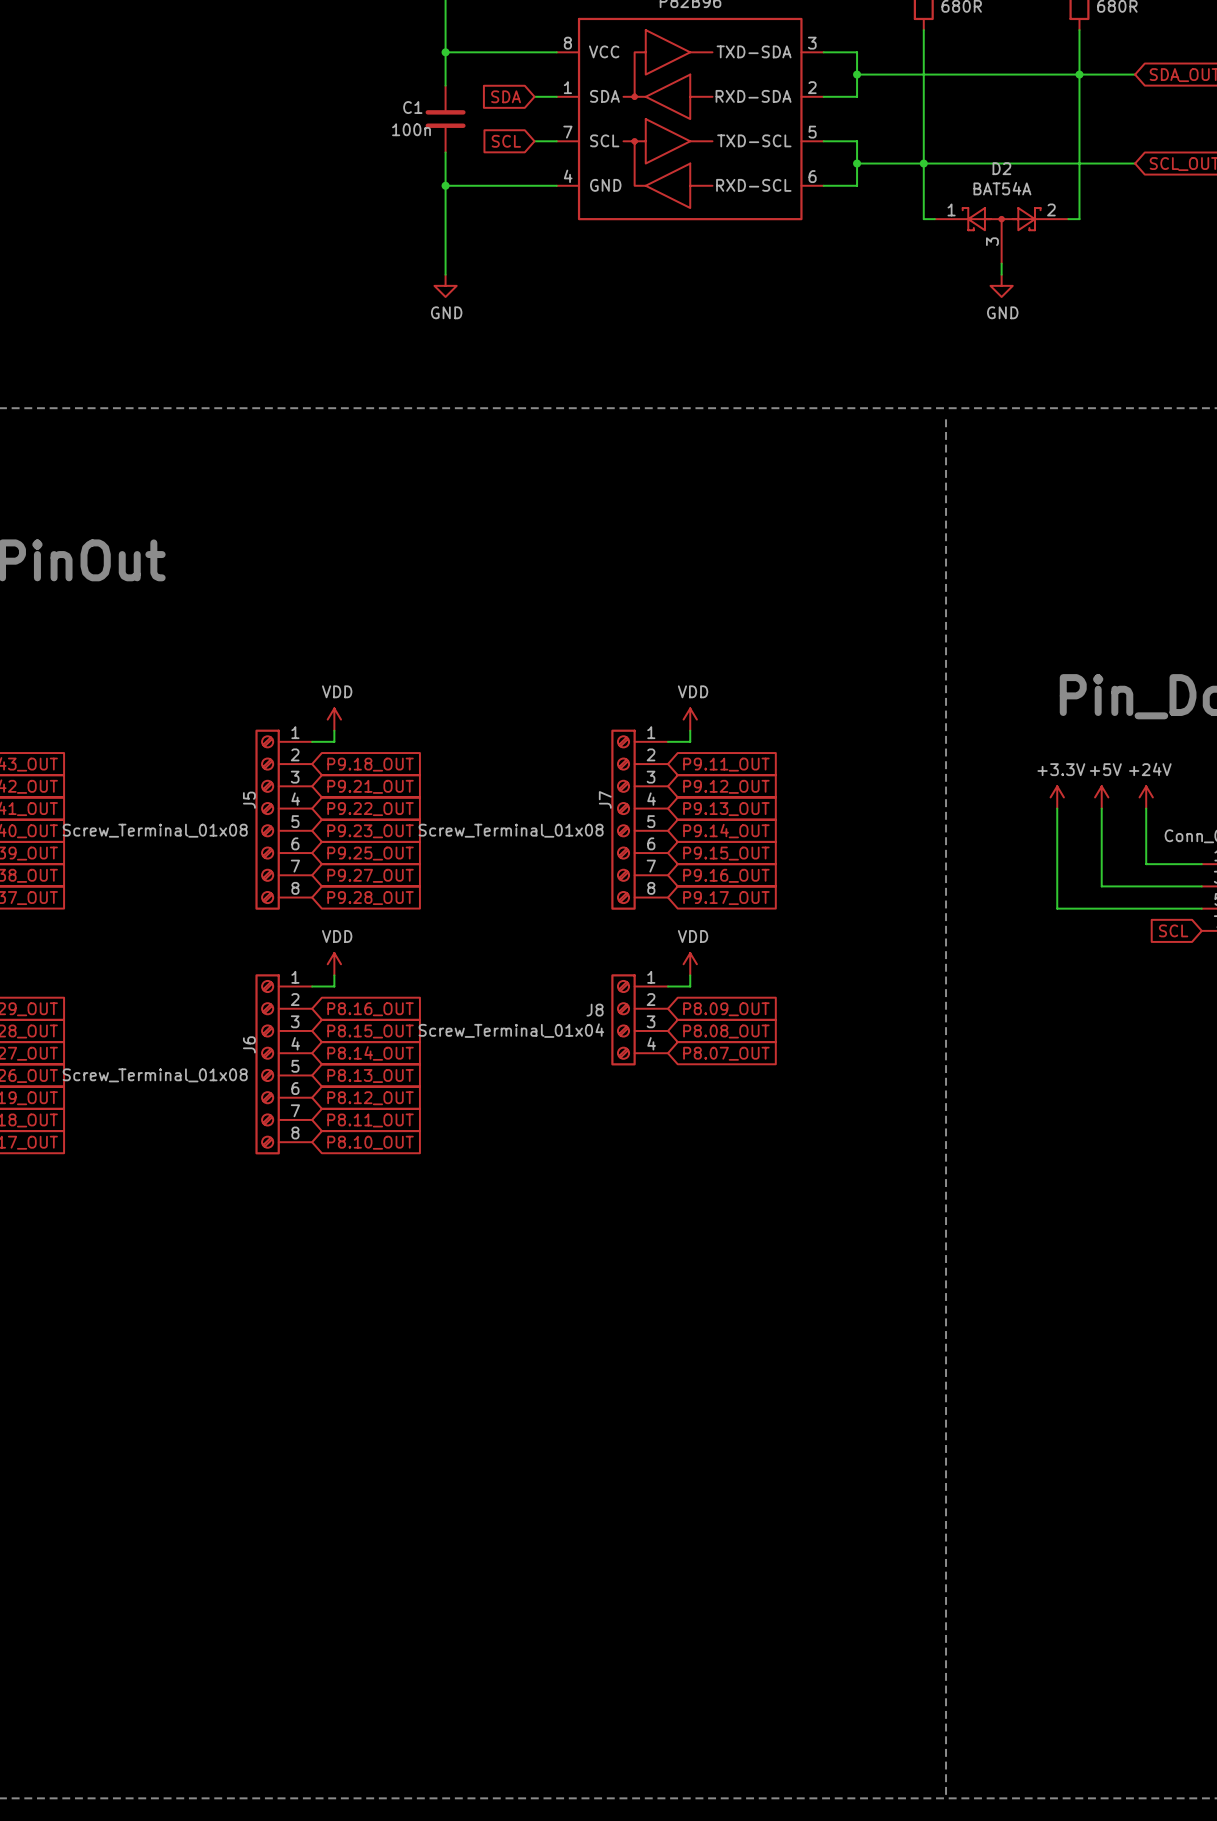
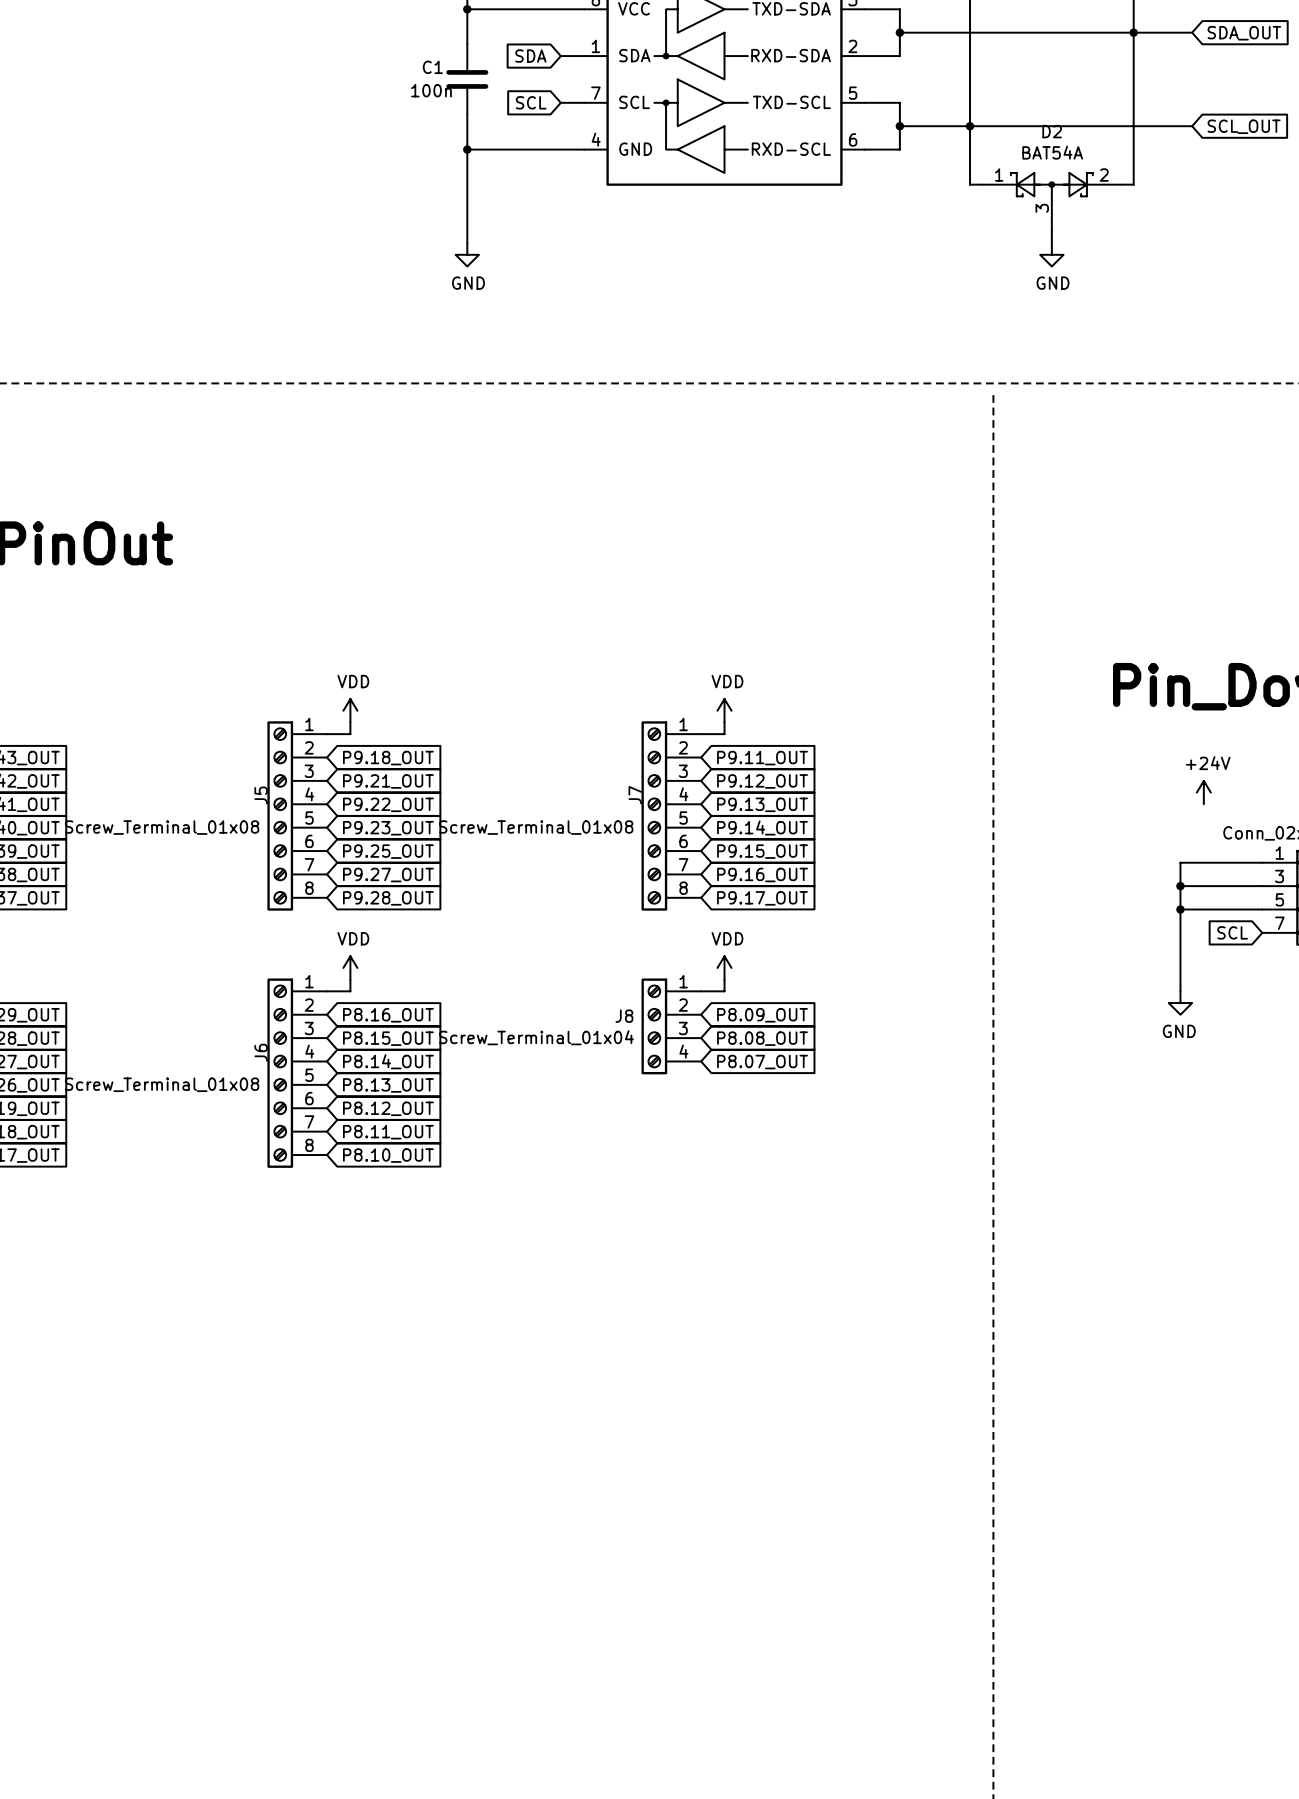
power symbol: +3.3V (1057, 797) -> none
power symbol: +5V (1101, 797) -> none
wire: (1057, 808) (1057, 908) (1123, 908) -> none
wire: (1101, 808) (1101, 886) (1123, 886) -> none
wire: (1146, 808) (1146, 864) -> (1180, 991) (1180, 862) (1203, 862)
junction: none -> (1180, 886)
junction: none -> (1180, 909)
power symbol: none -> GND (1180, 1003)

